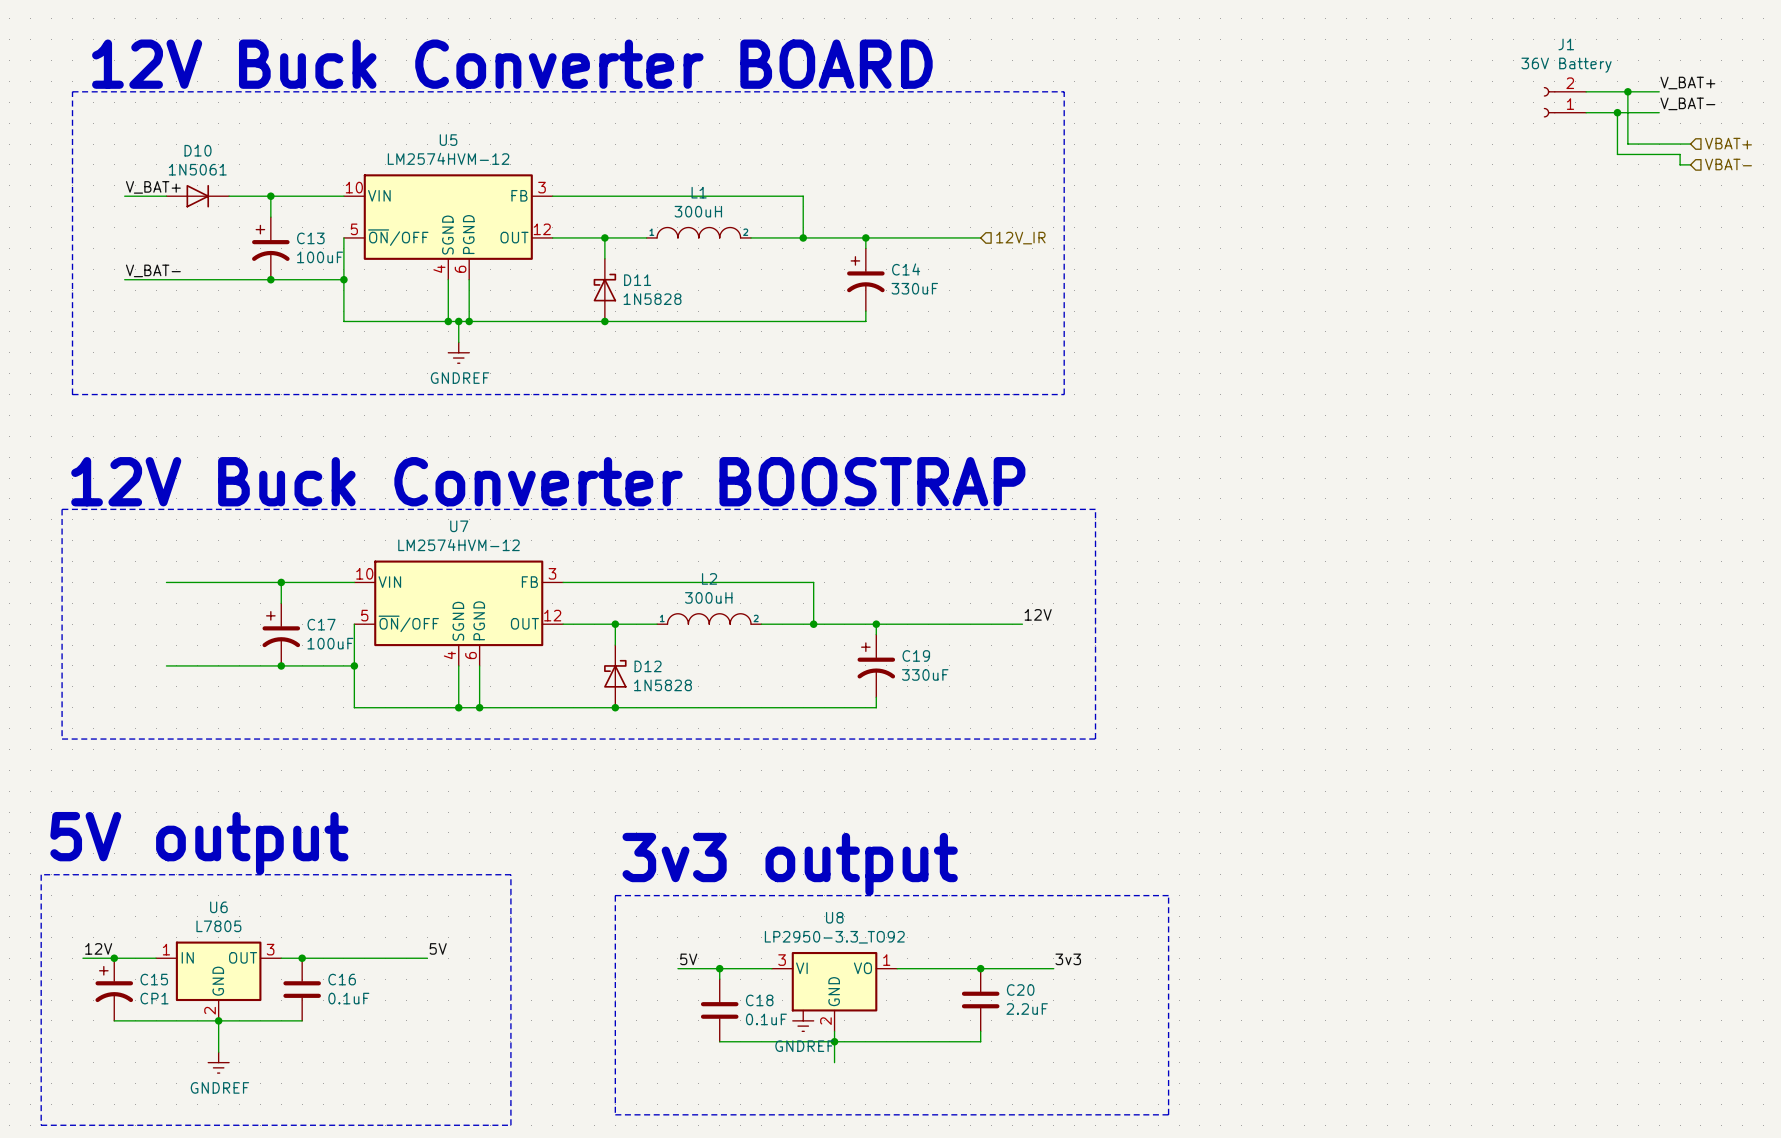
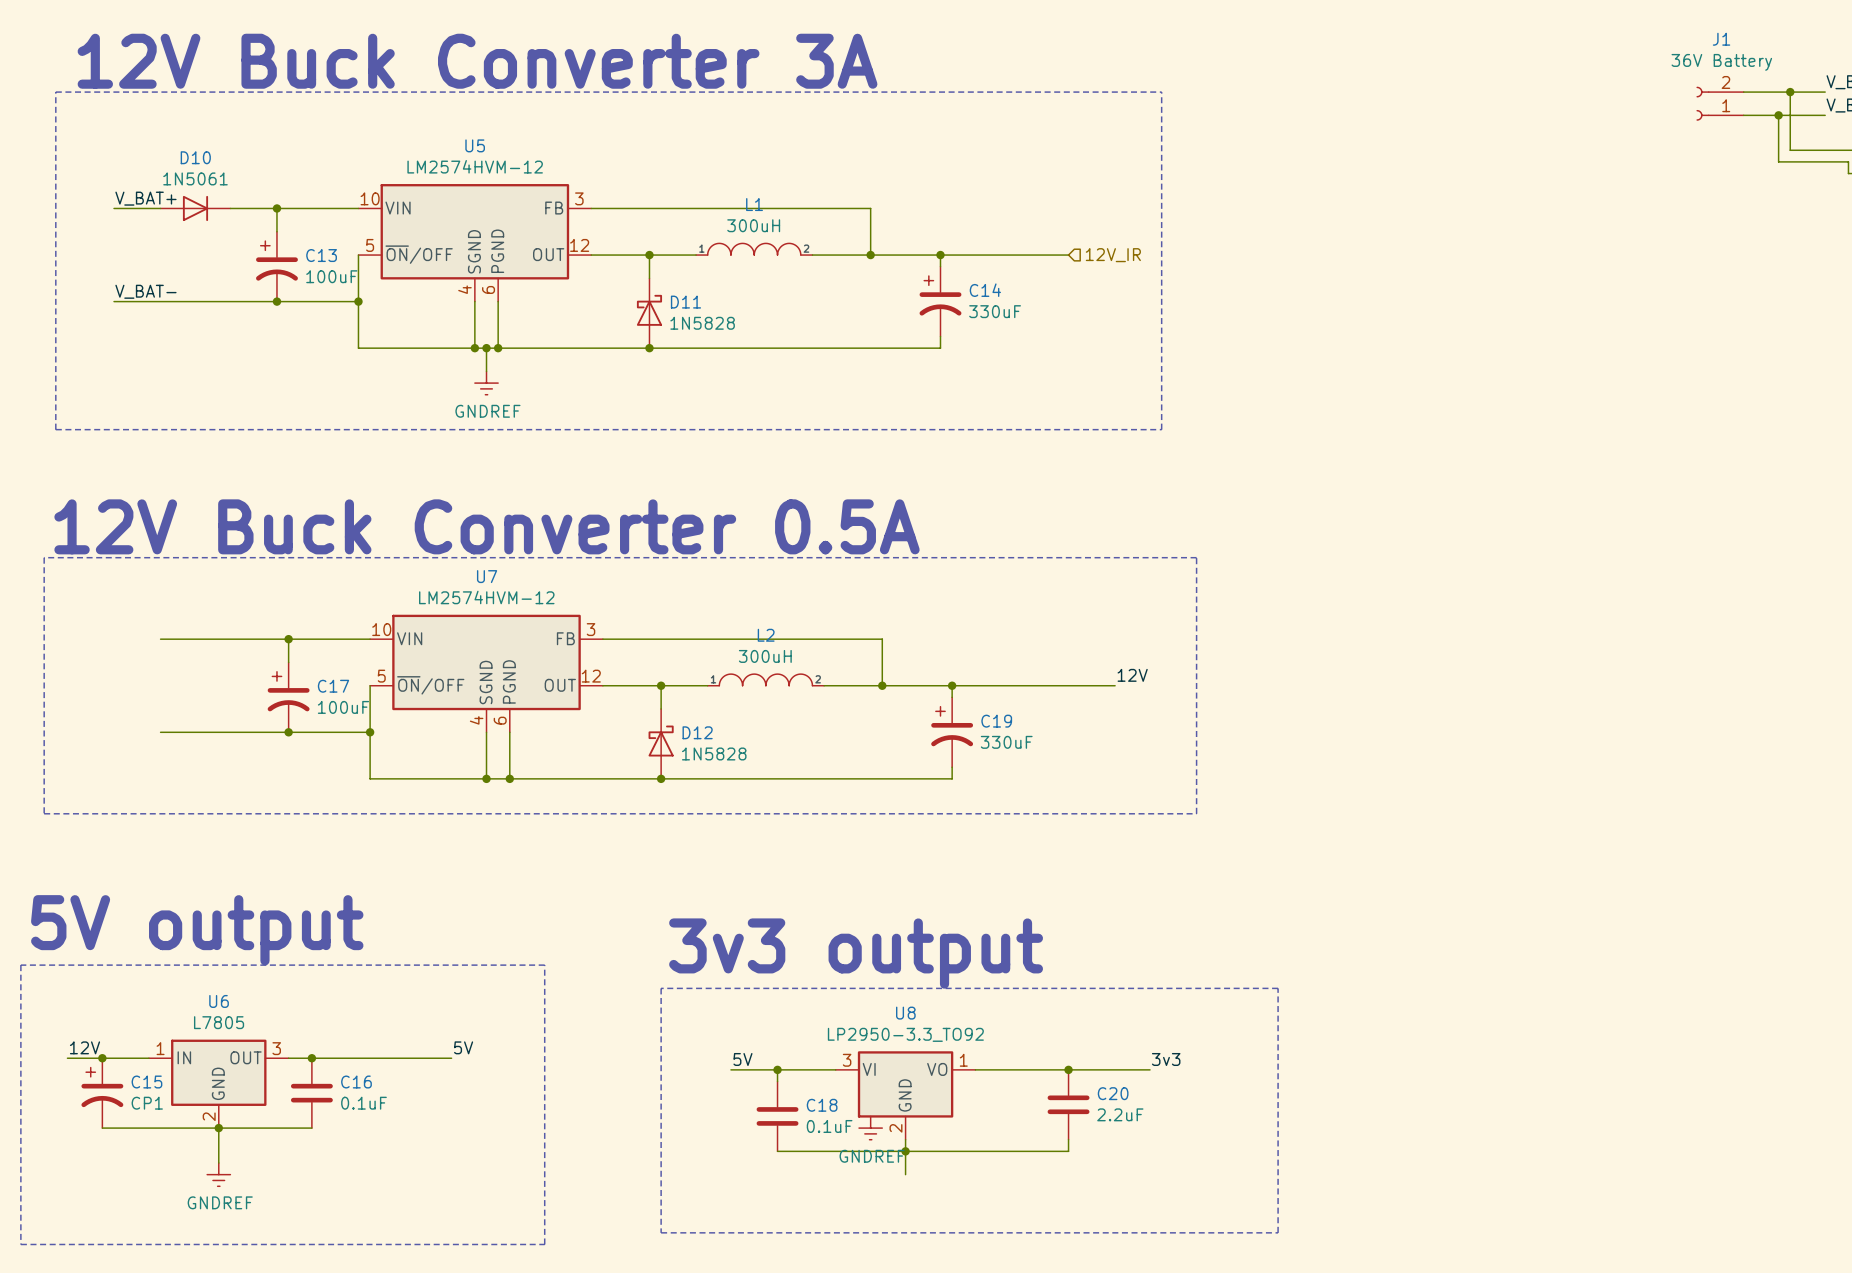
text: 12V Buck Converter BOARD (512, 64) -> 12V Buck Converter 3A (477, 61)
text: 12V Buck Converter BOOSTRAP (548, 481) -> 12V Buck Converter 0.5A (487, 526)

